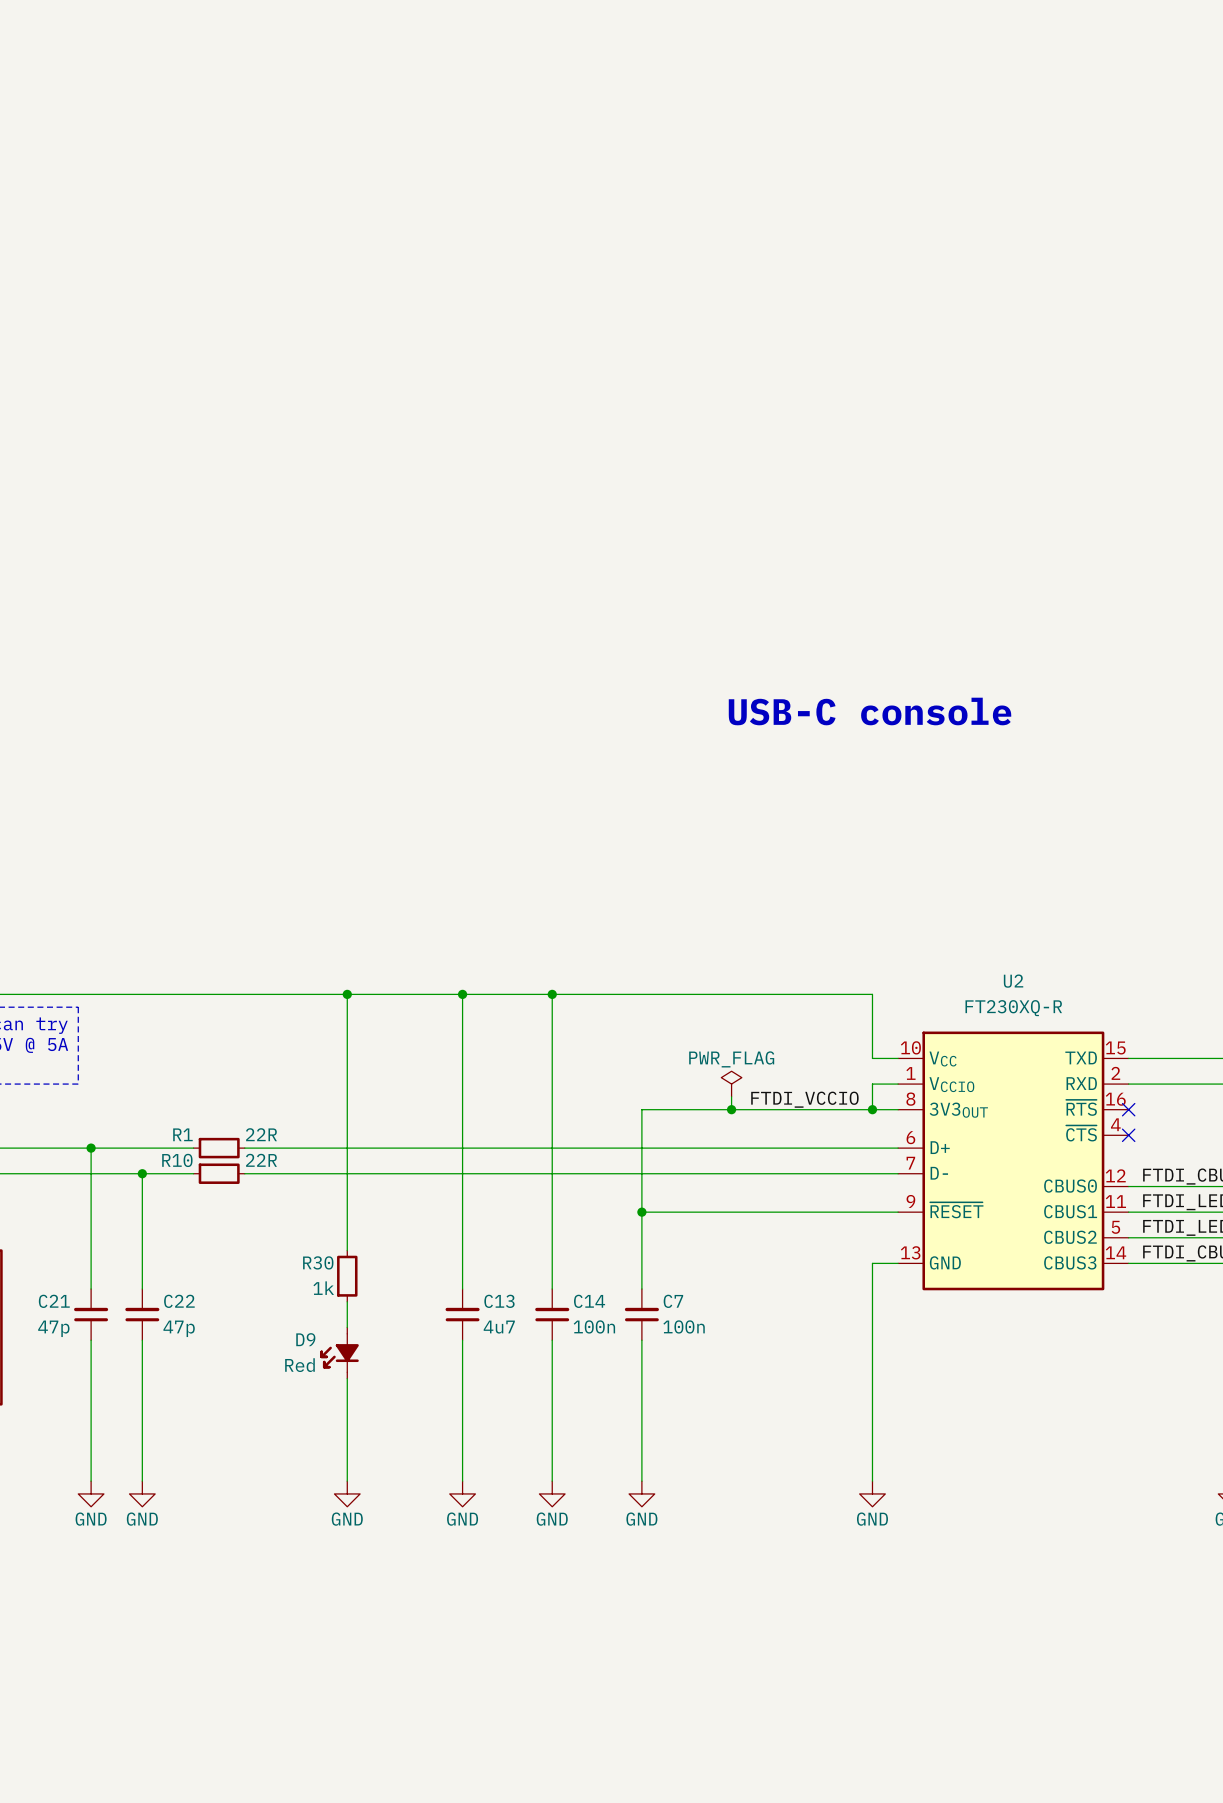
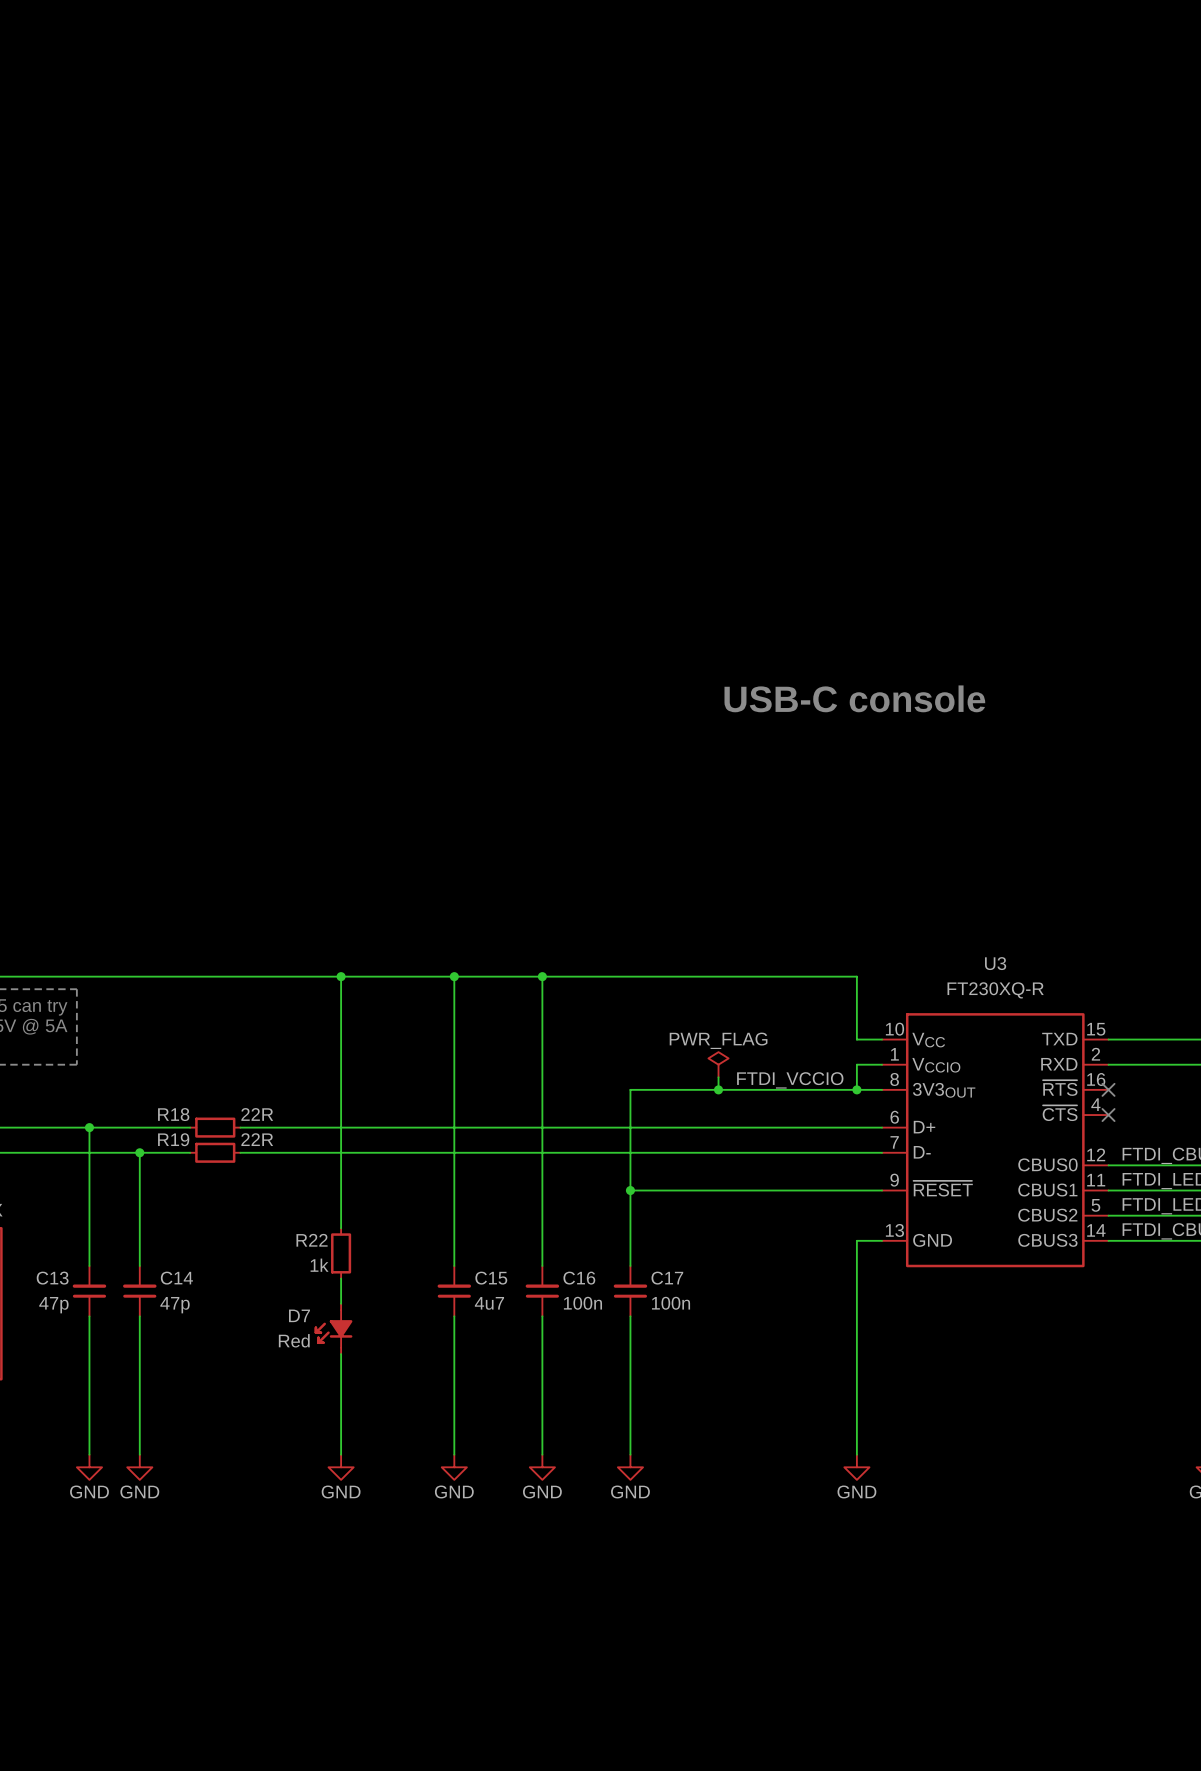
U2 name: U2 (1013, 981) -> U3 (995, 963)
R1 name: R1 (182, 1134) -> R18 (173, 1114)
R10 name: R10 (177, 1160) -> R19 (173, 1139)
R30 name: R30 (318, 1262) -> R22 (312, 1240)
C21 name: C21 (54, 1301) -> C13 (52, 1278)
C22 name: C22 (179, 1301) -> C14 (176, 1278)
C13 name: C13 (499, 1301) -> C15 (491, 1278)
C14 name: C14 (589, 1301) -> C16 (579, 1278)
C7 name: C7 (673, 1301) -> C17 (667, 1278)
D9 name: D9 (305, 1339) -> D7 (299, 1315)

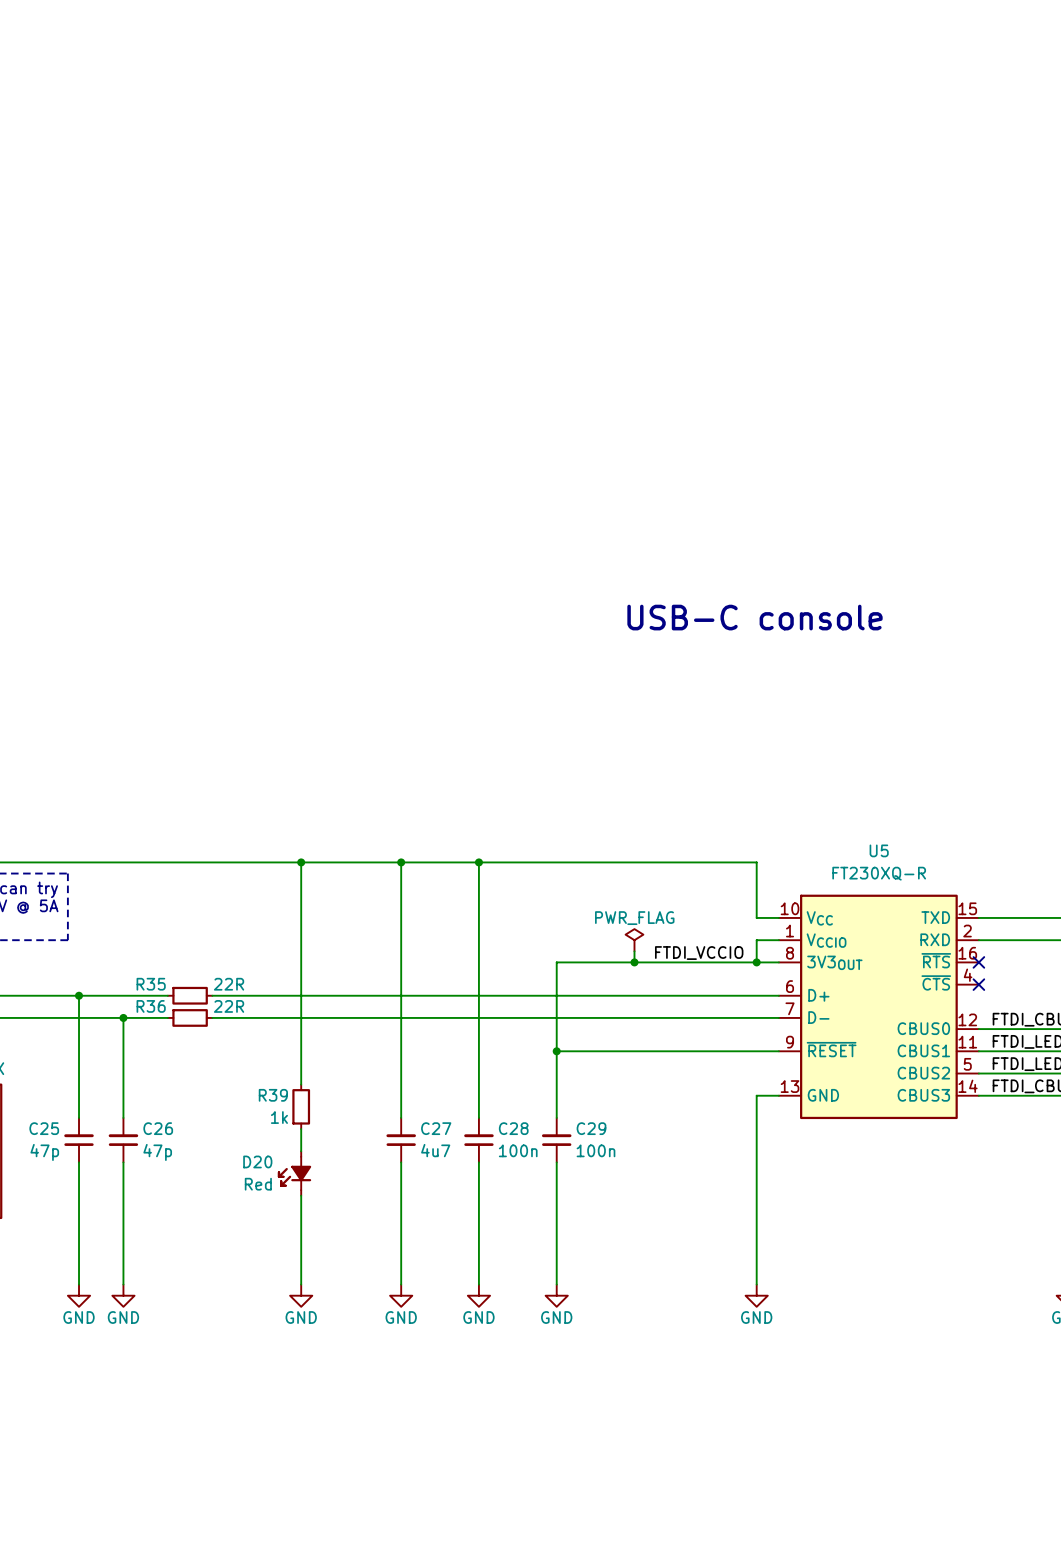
U3 name: U3 (995, 963) -> U5 (879, 850)
R18 name: R18 (173, 1114) -> R35 (151, 984)
R19 name: R19 (173, 1139) -> R36 (151, 1006)
R22 name: R22 (312, 1240) -> R39 (273, 1095)
C13 name: C13 (52, 1278) -> C25 (44, 1128)
C14 name: C14 (176, 1278) -> C26 (158, 1128)
C15 name: C15 (491, 1278) -> C27 (436, 1128)
C16 name: C16 (579, 1278) -> C28 (513, 1128)
C17 name: C17 (667, 1278) -> C29 (591, 1128)
D7 name: D7 (299, 1315) -> D20 (257, 1161)

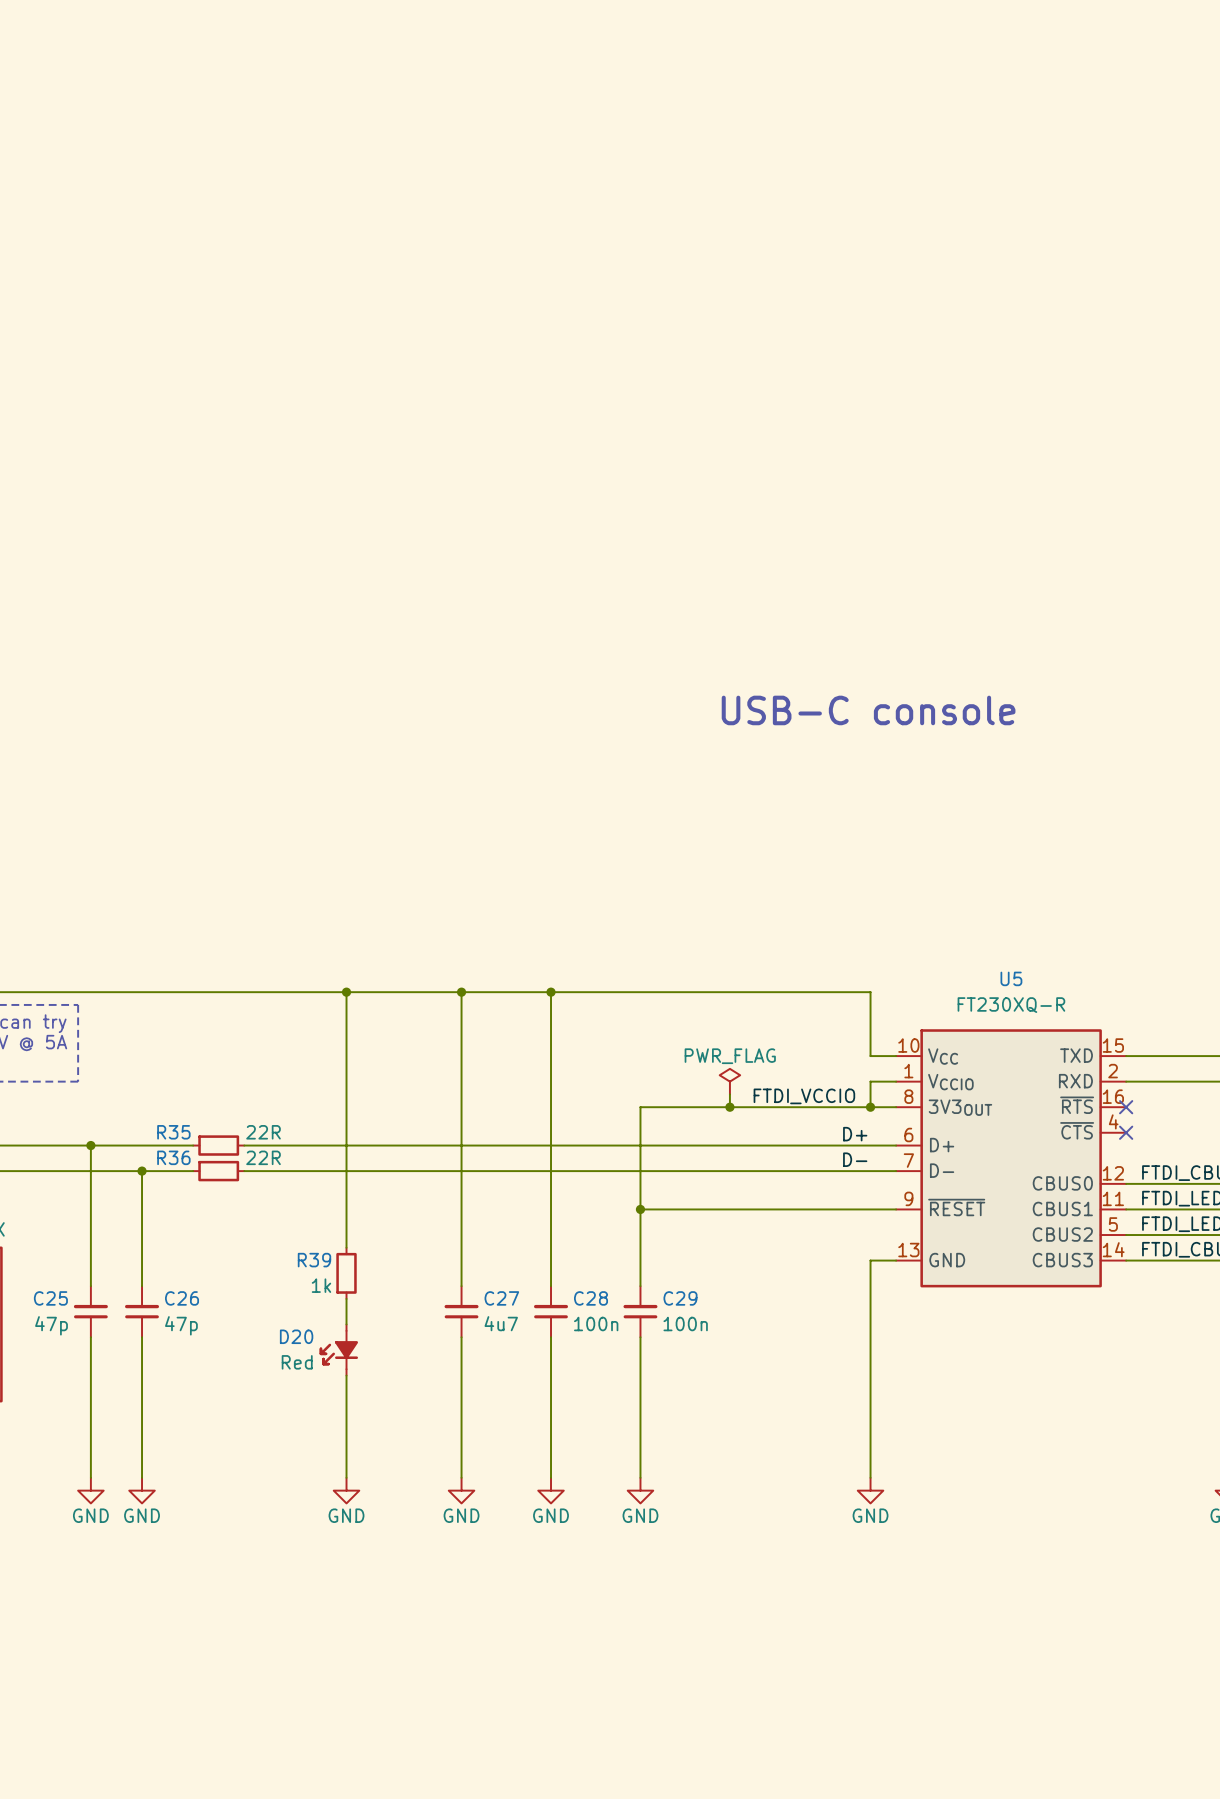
label: none -> D+ (855, 1134)
label: none -> D- (855, 1159)

